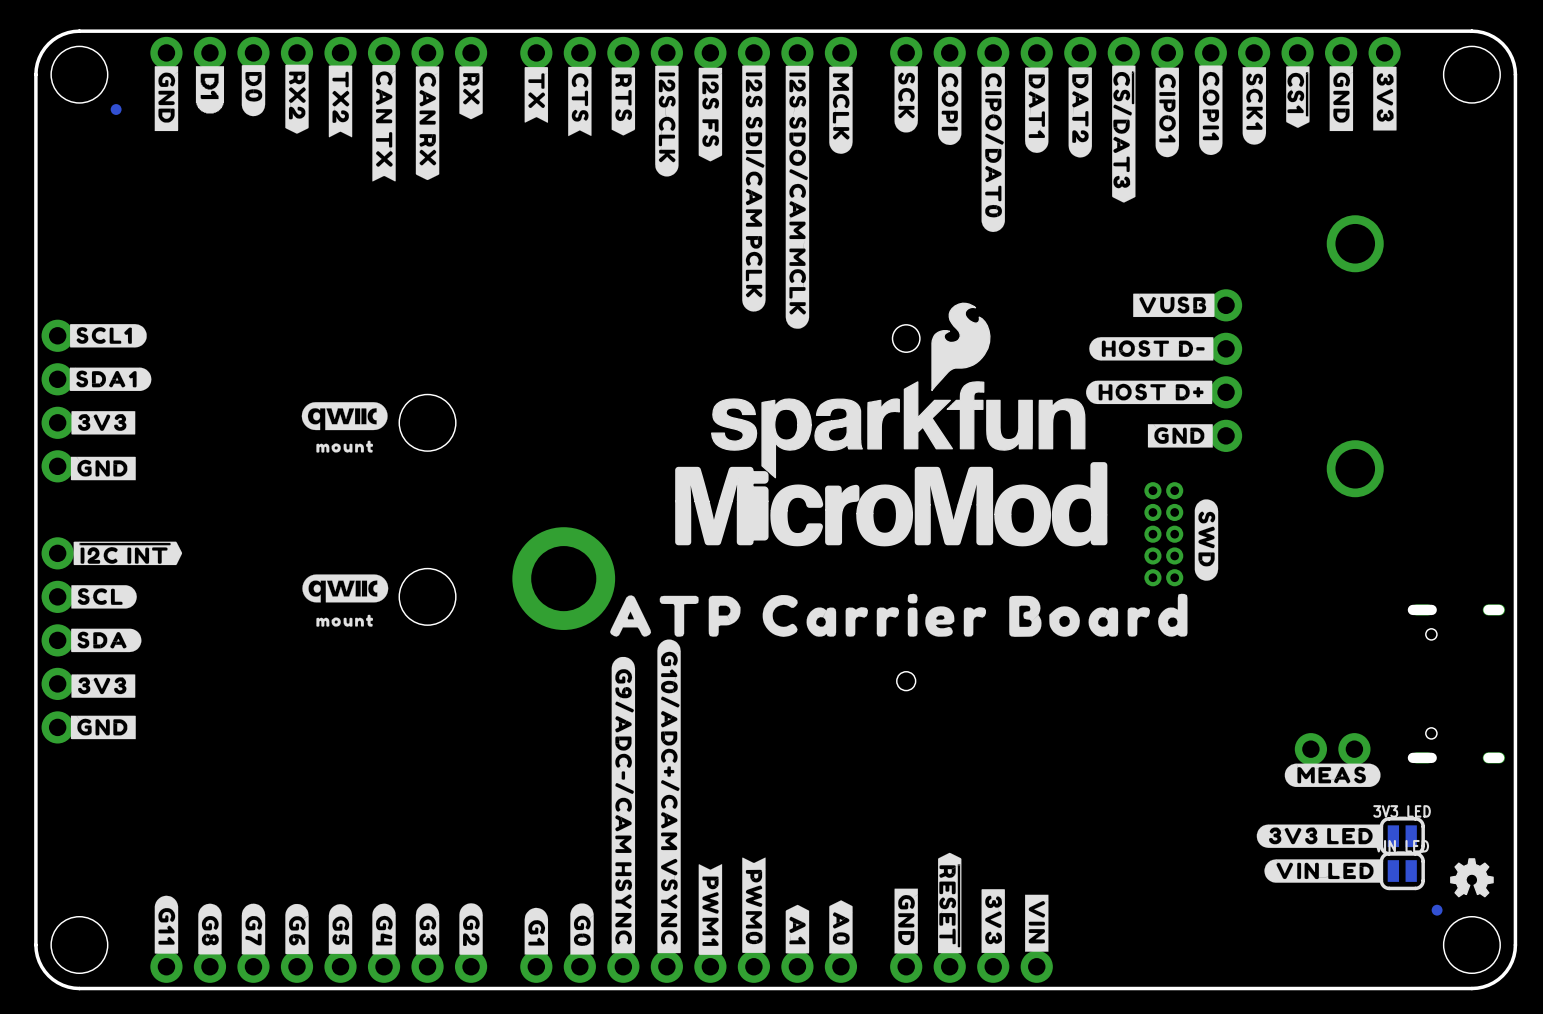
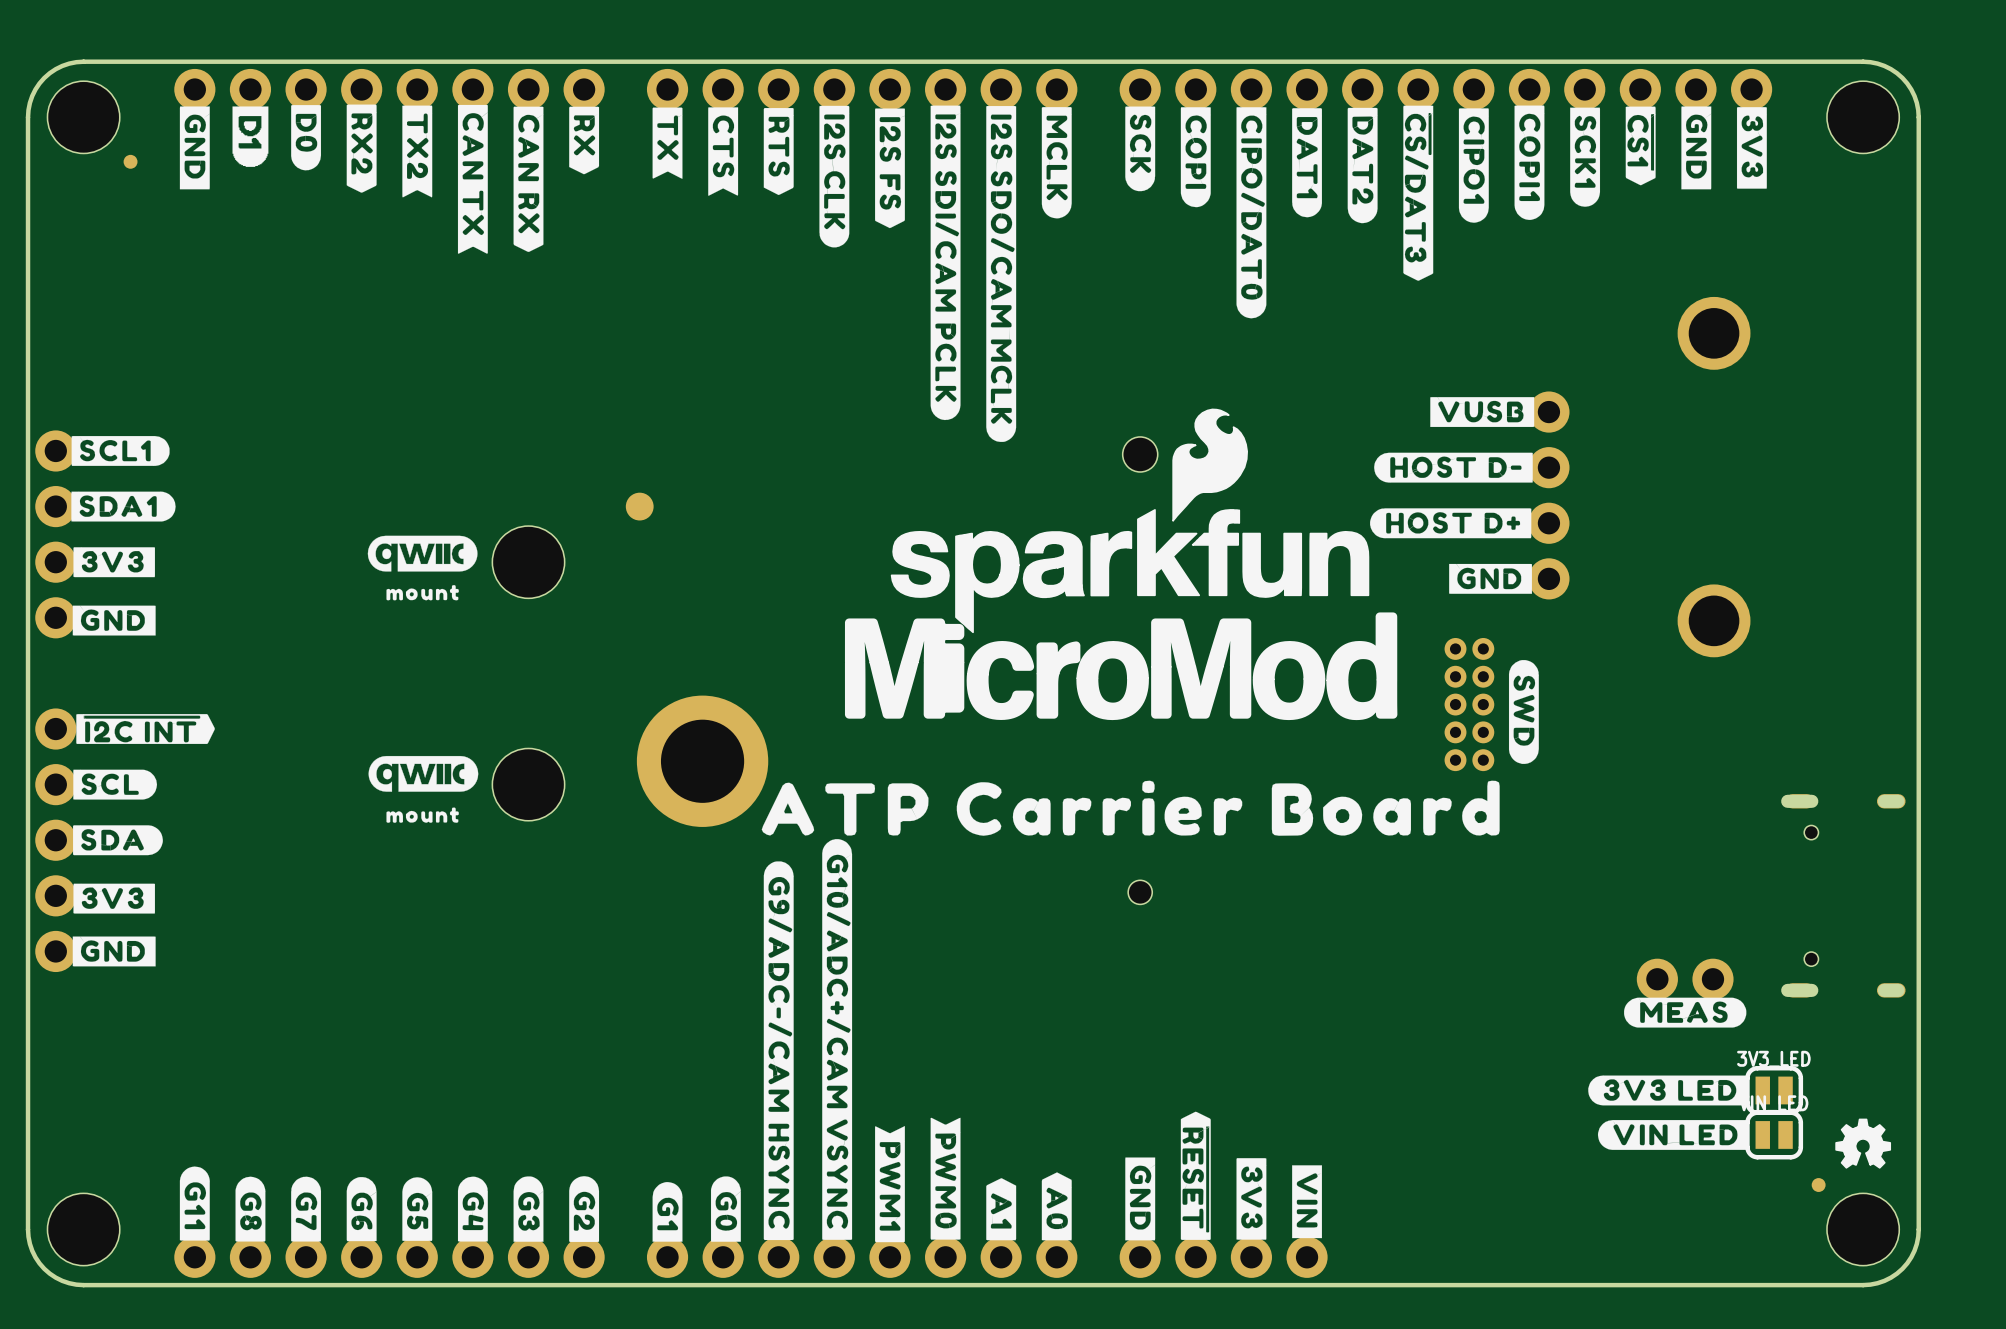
part: none -> (639, 506)

